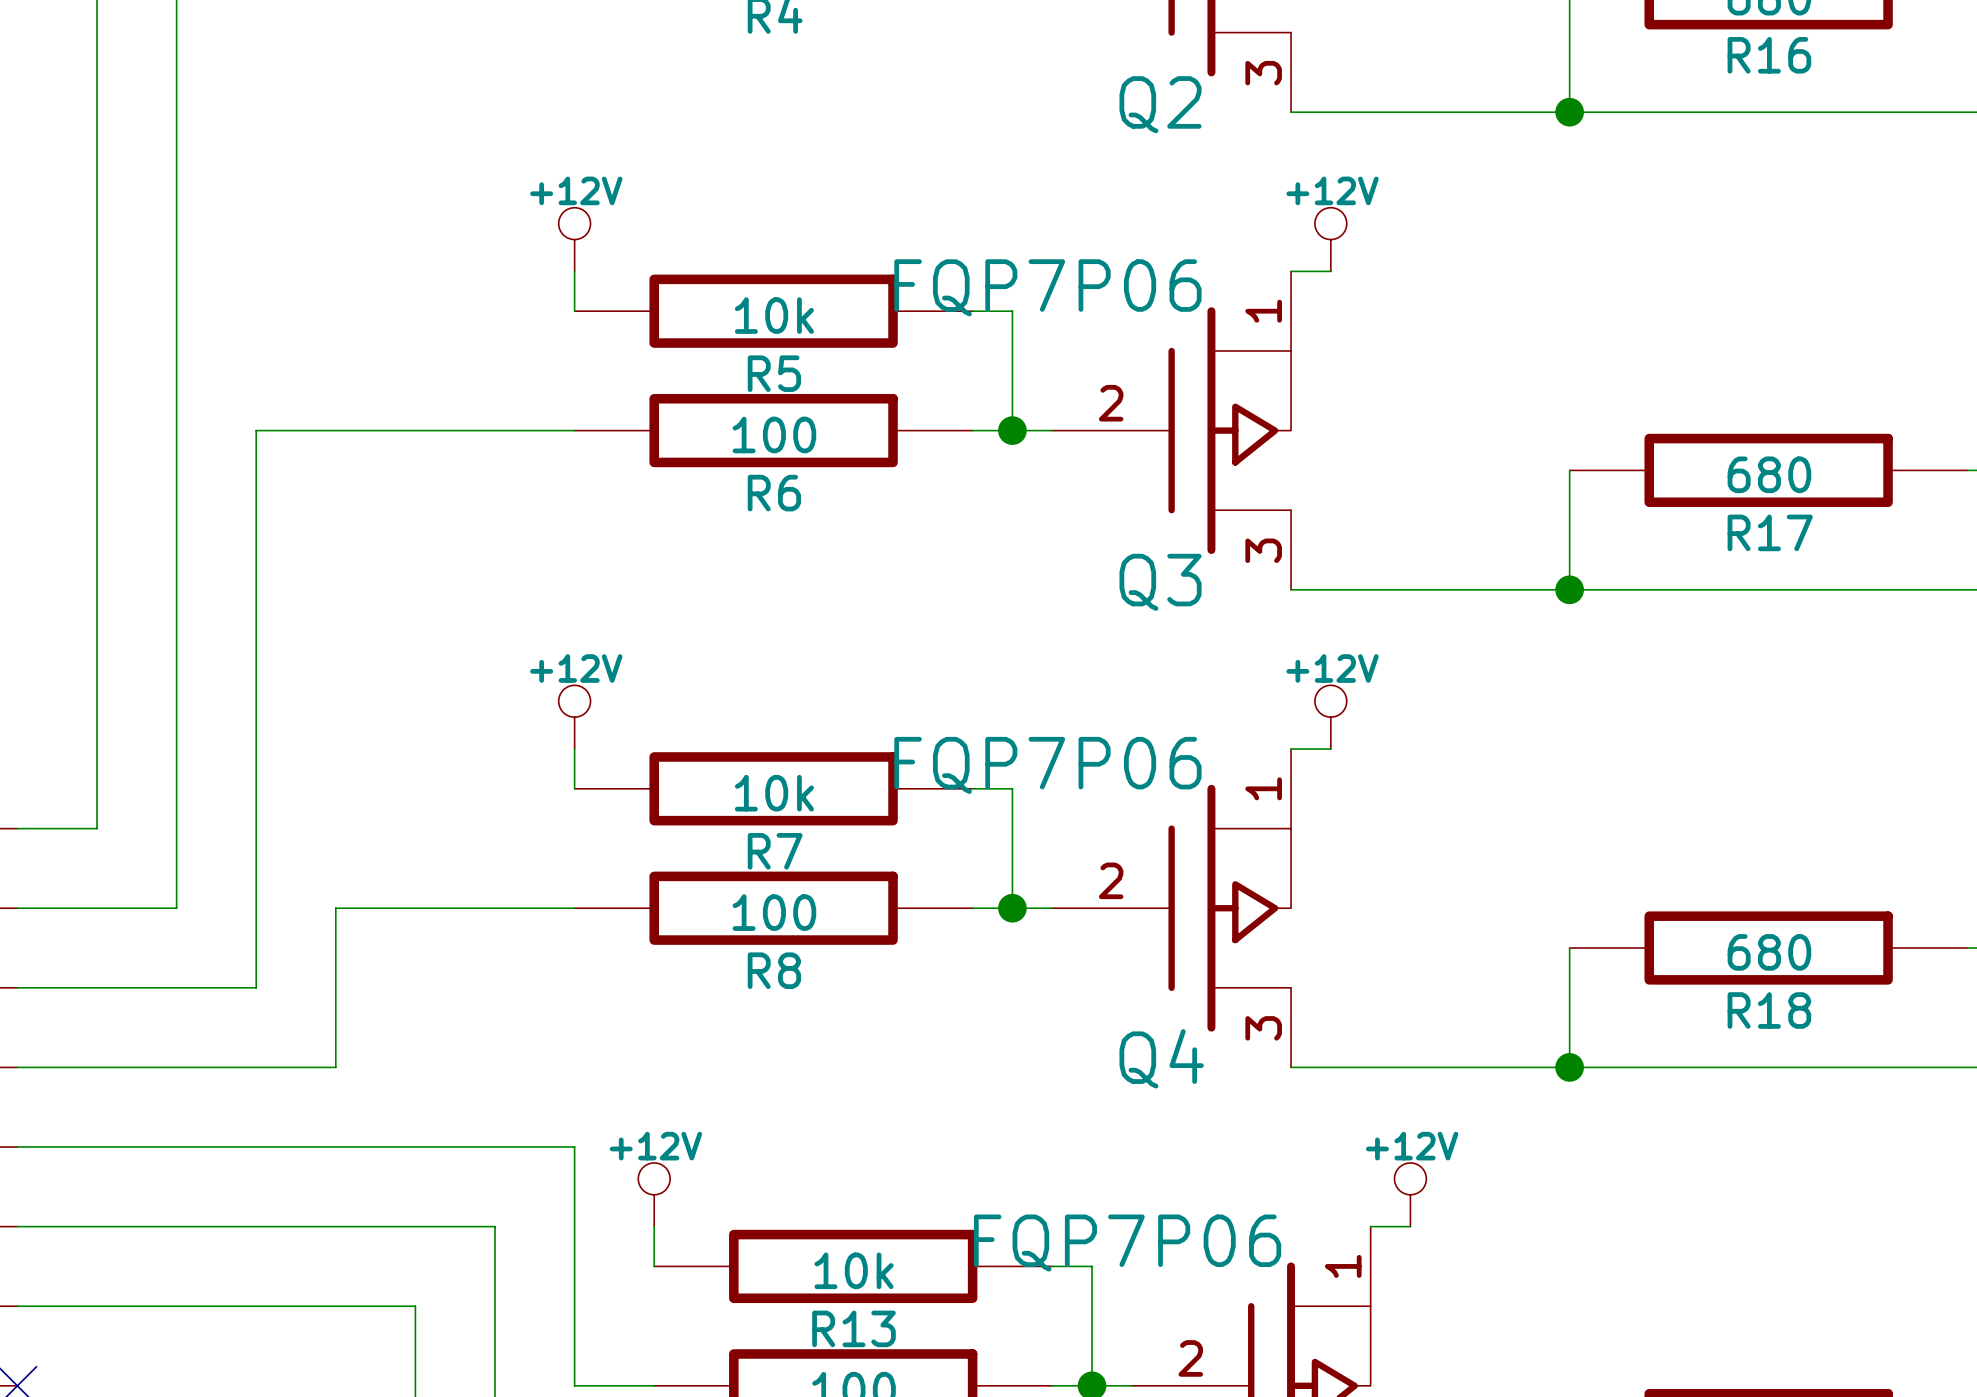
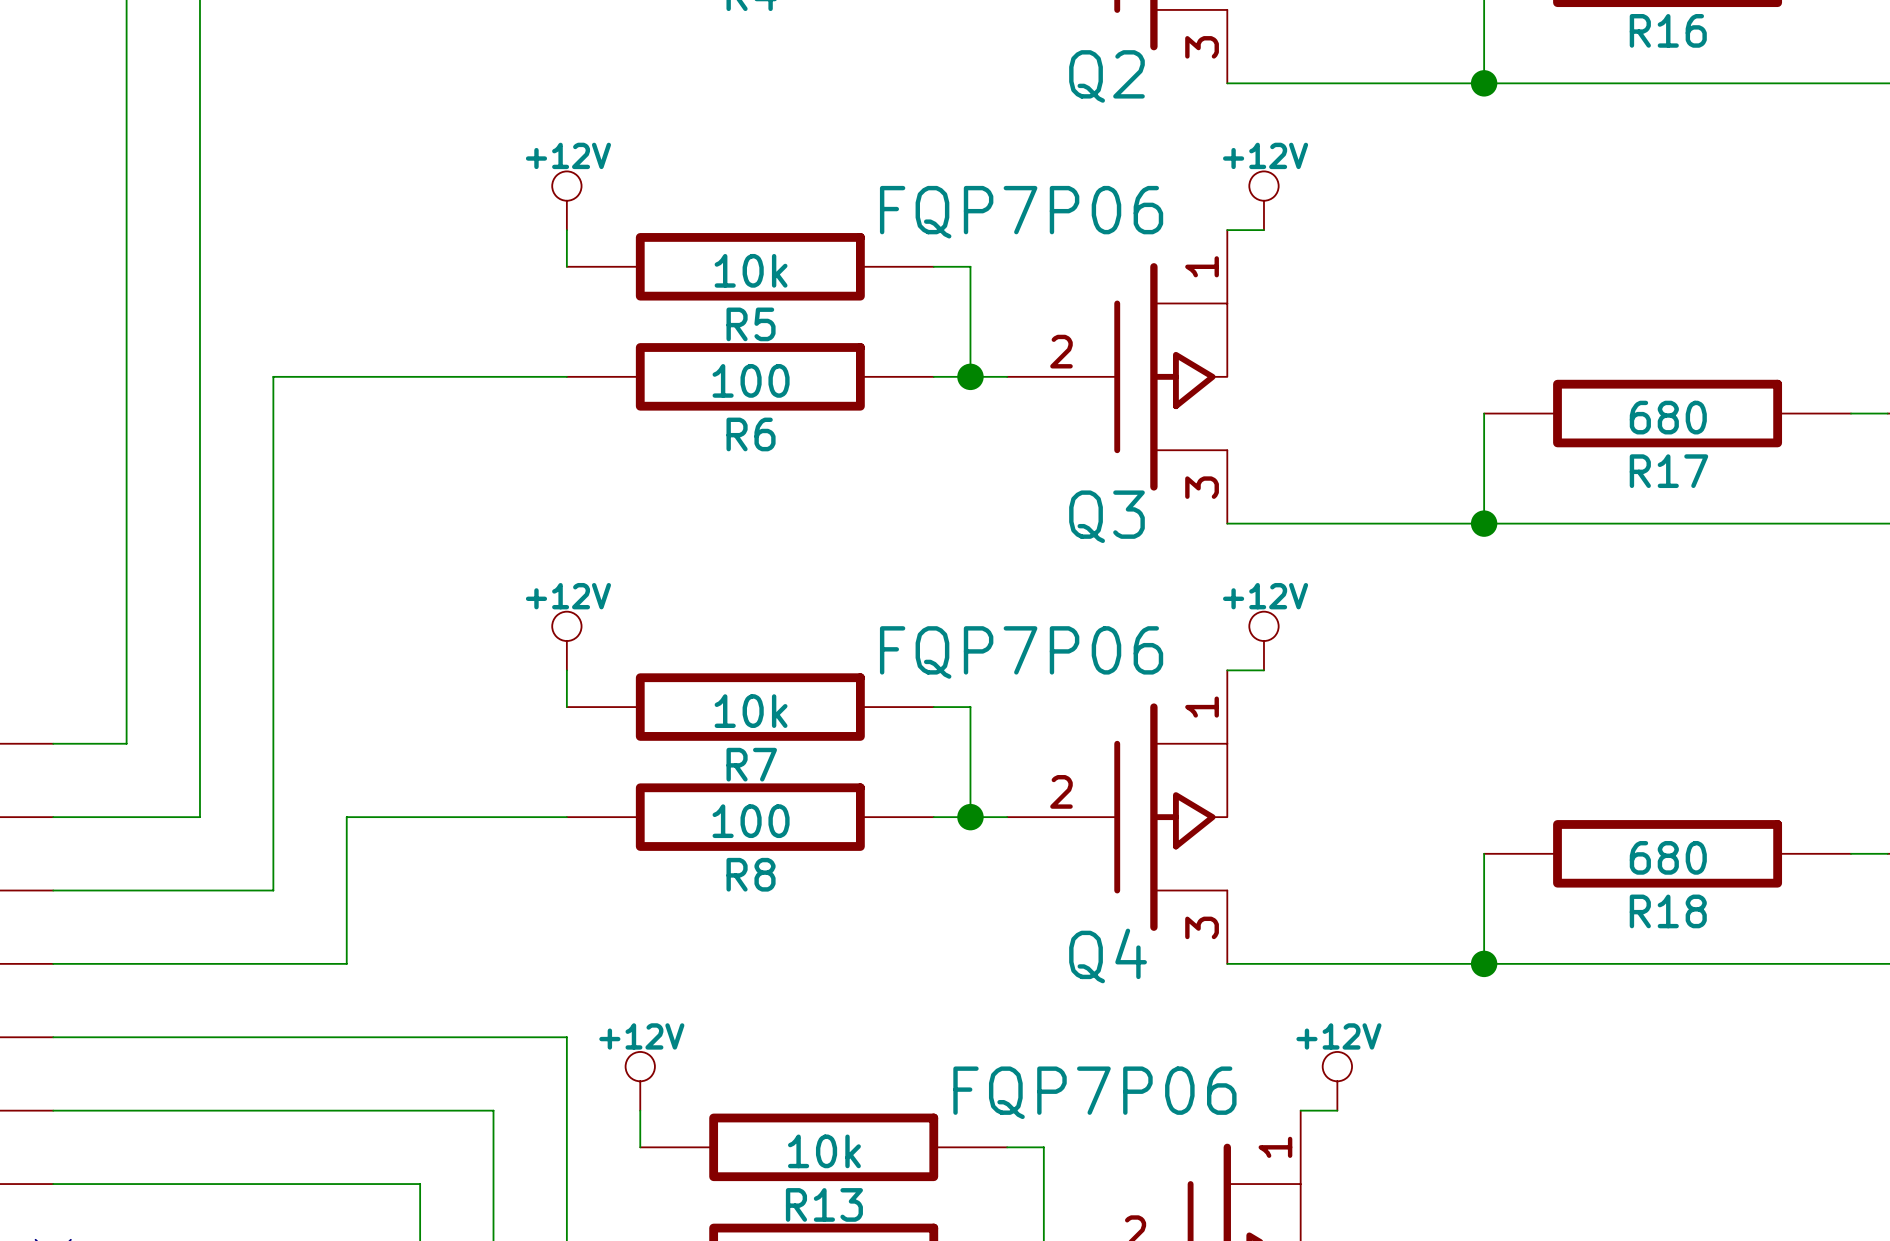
Q3 value position: FQP7P06 (1047, 287) -> FQP7P06 (1021, 212)
Q4 value position: FQP7P06 (1047, 765) -> FQP7P06 (1021, 652)
part value position: FQP7P06 (1127, 1243) -> FQP7P06 (1094, 1092)

